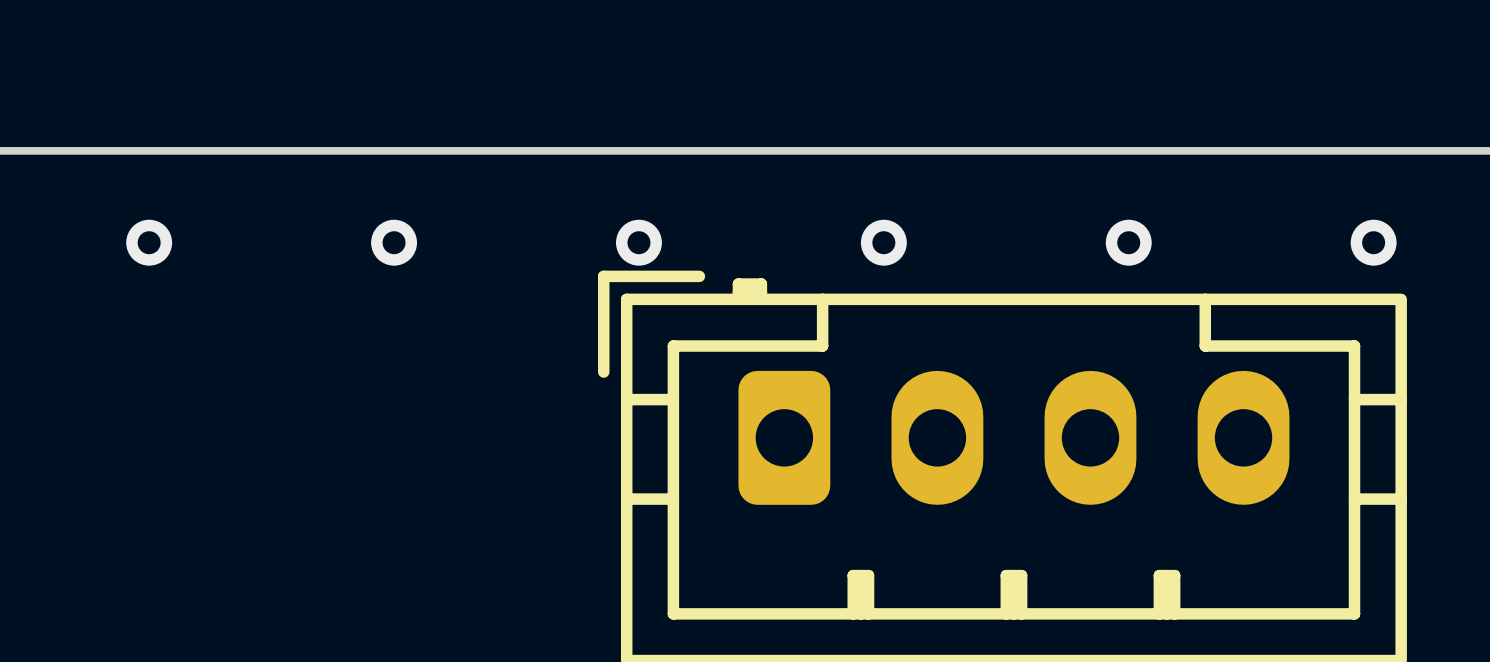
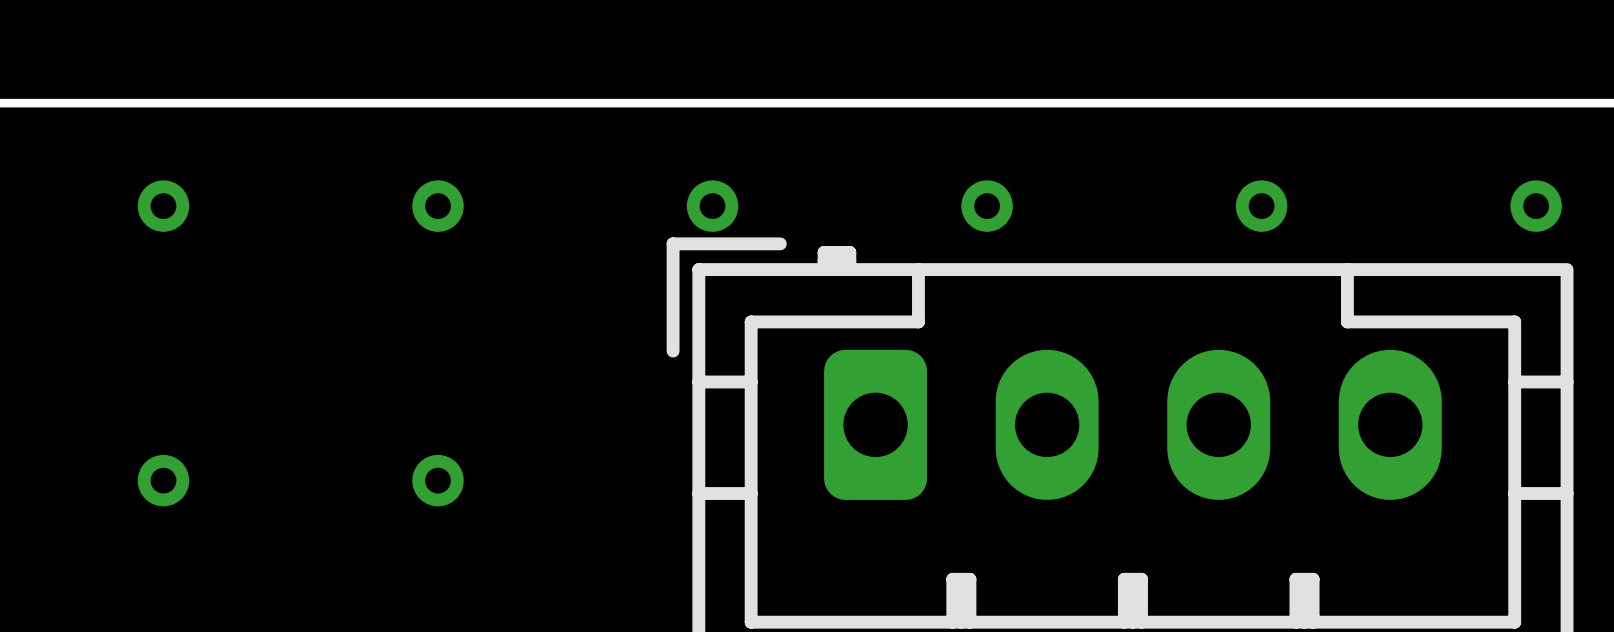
via: none -> (163, 480)
via: none -> (438, 480)

